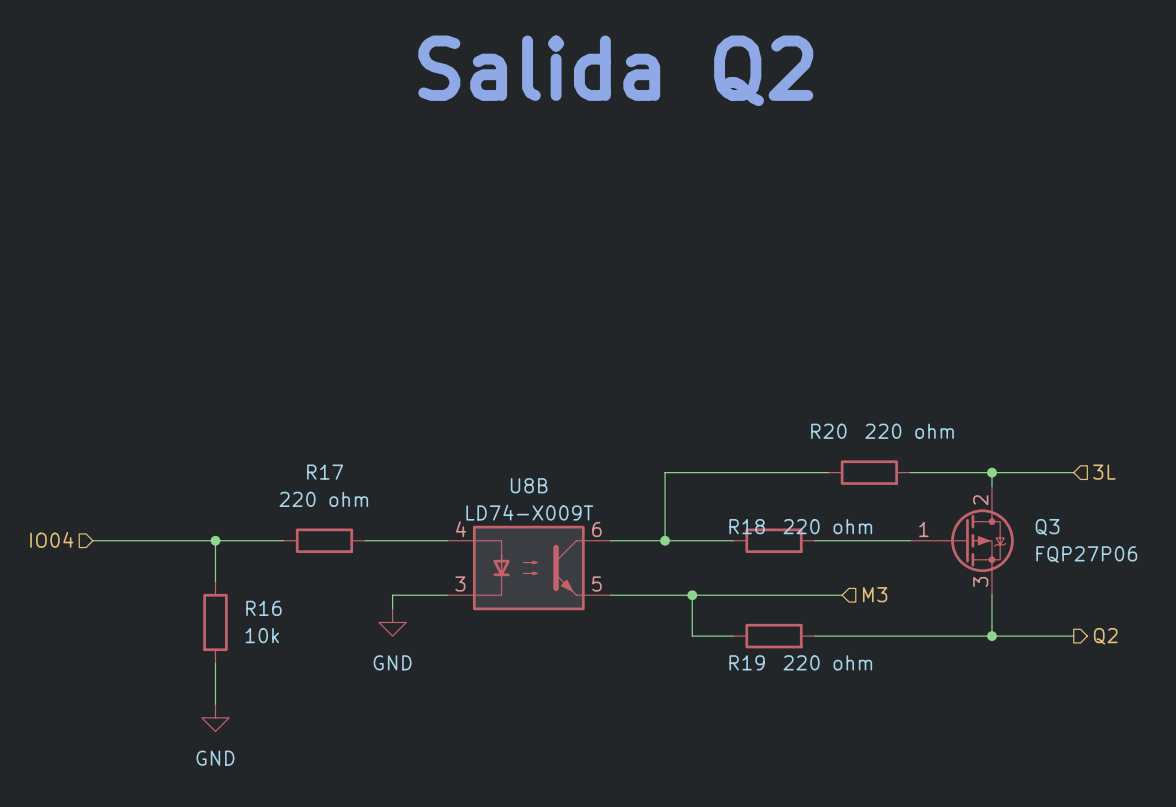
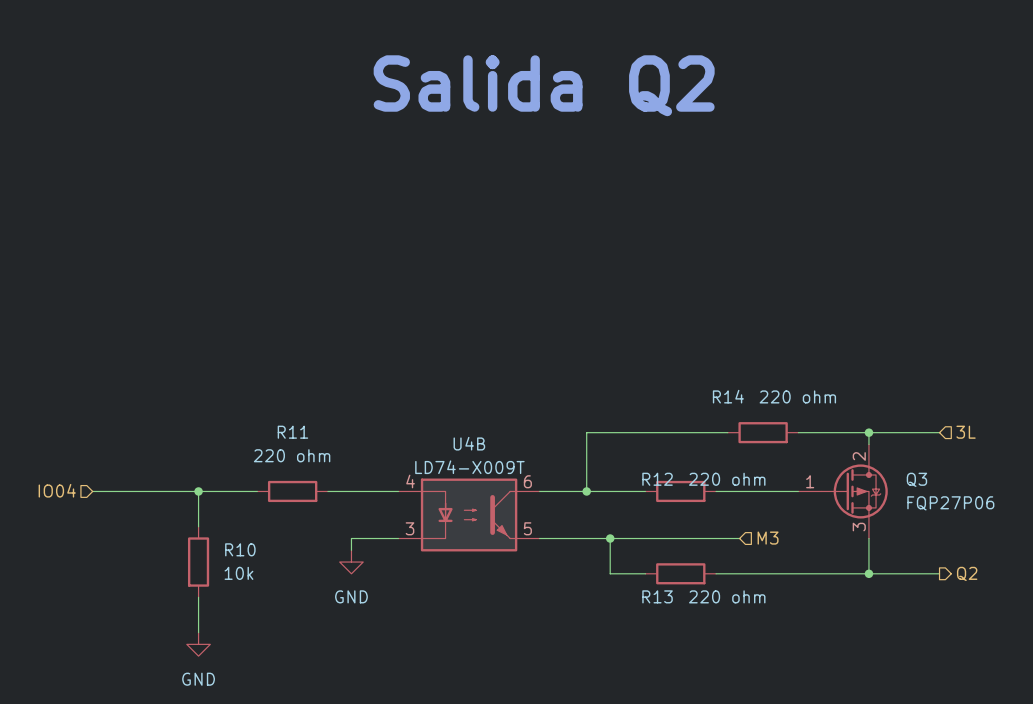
R20 name: R20 (828, 431) -> R14 (728, 396)
R17 name: R17 (325, 472) -> R11 (292, 432)
U8B name: U8B (529, 485) -> U4B (469, 443)
R18 name: R18 (747, 526) -> R12 (657, 479)
R16 name: R16 (263, 608) -> R10 (240, 549)
R19 name: R19 (747, 662) -> R13 (657, 596)

